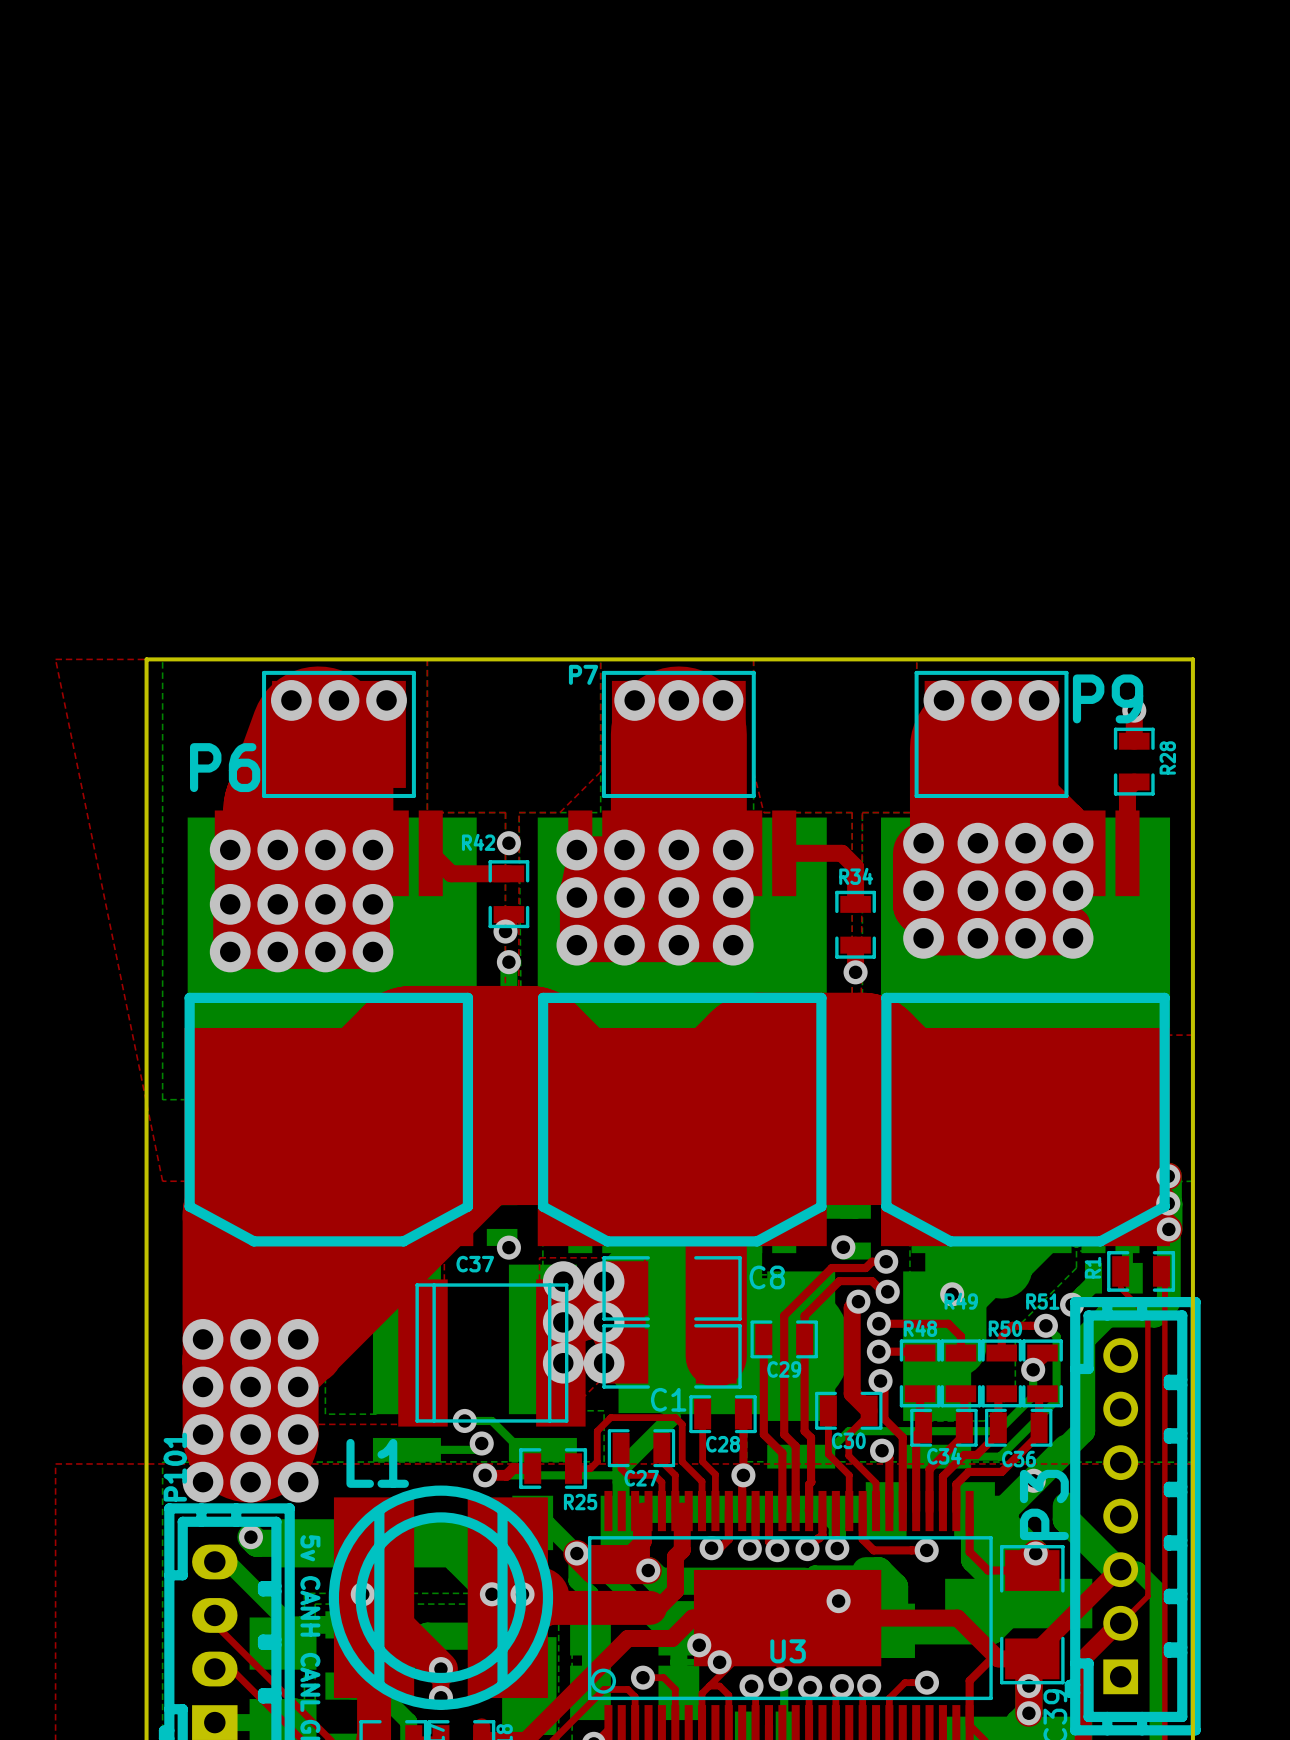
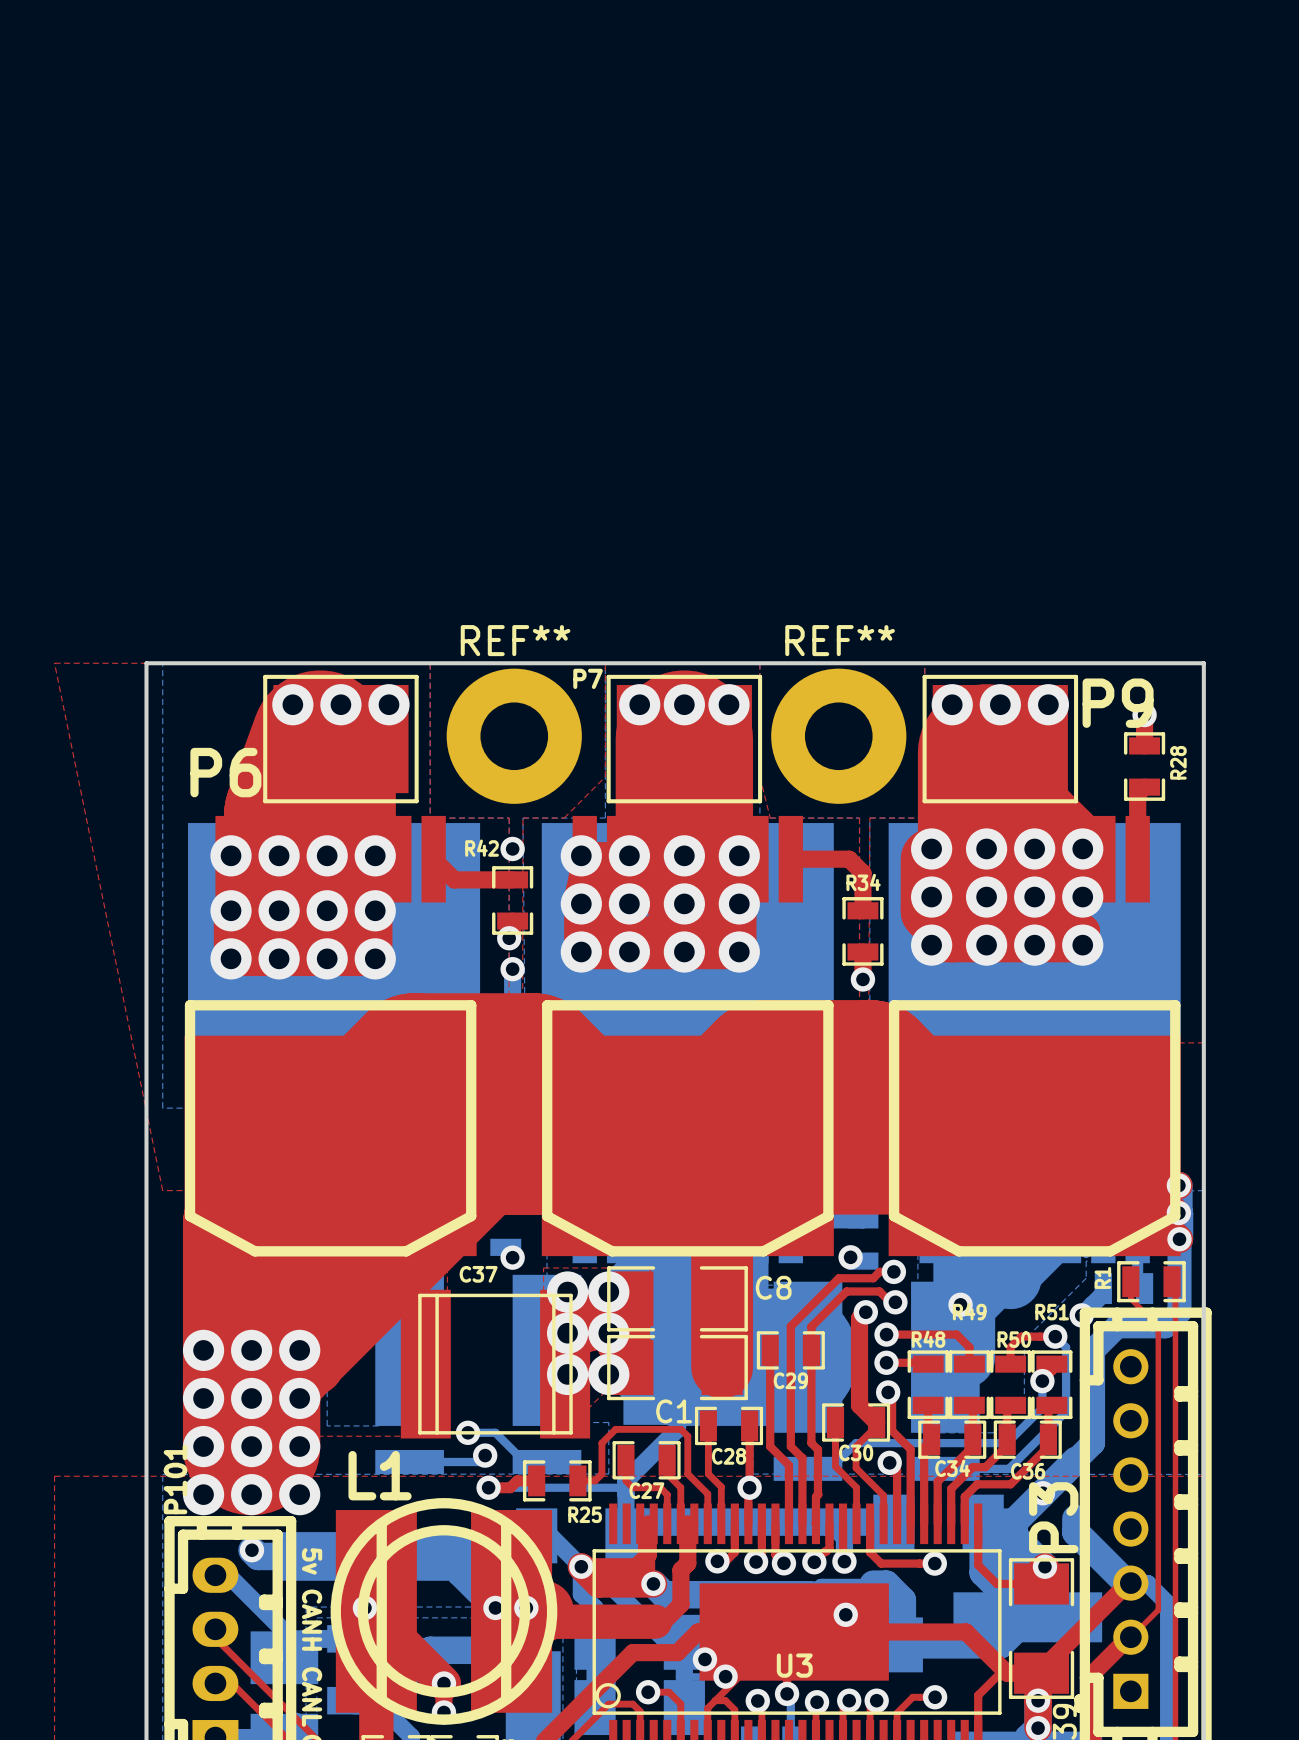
REF**: none -> (514, 736)
REF**: none -> (838, 736)

